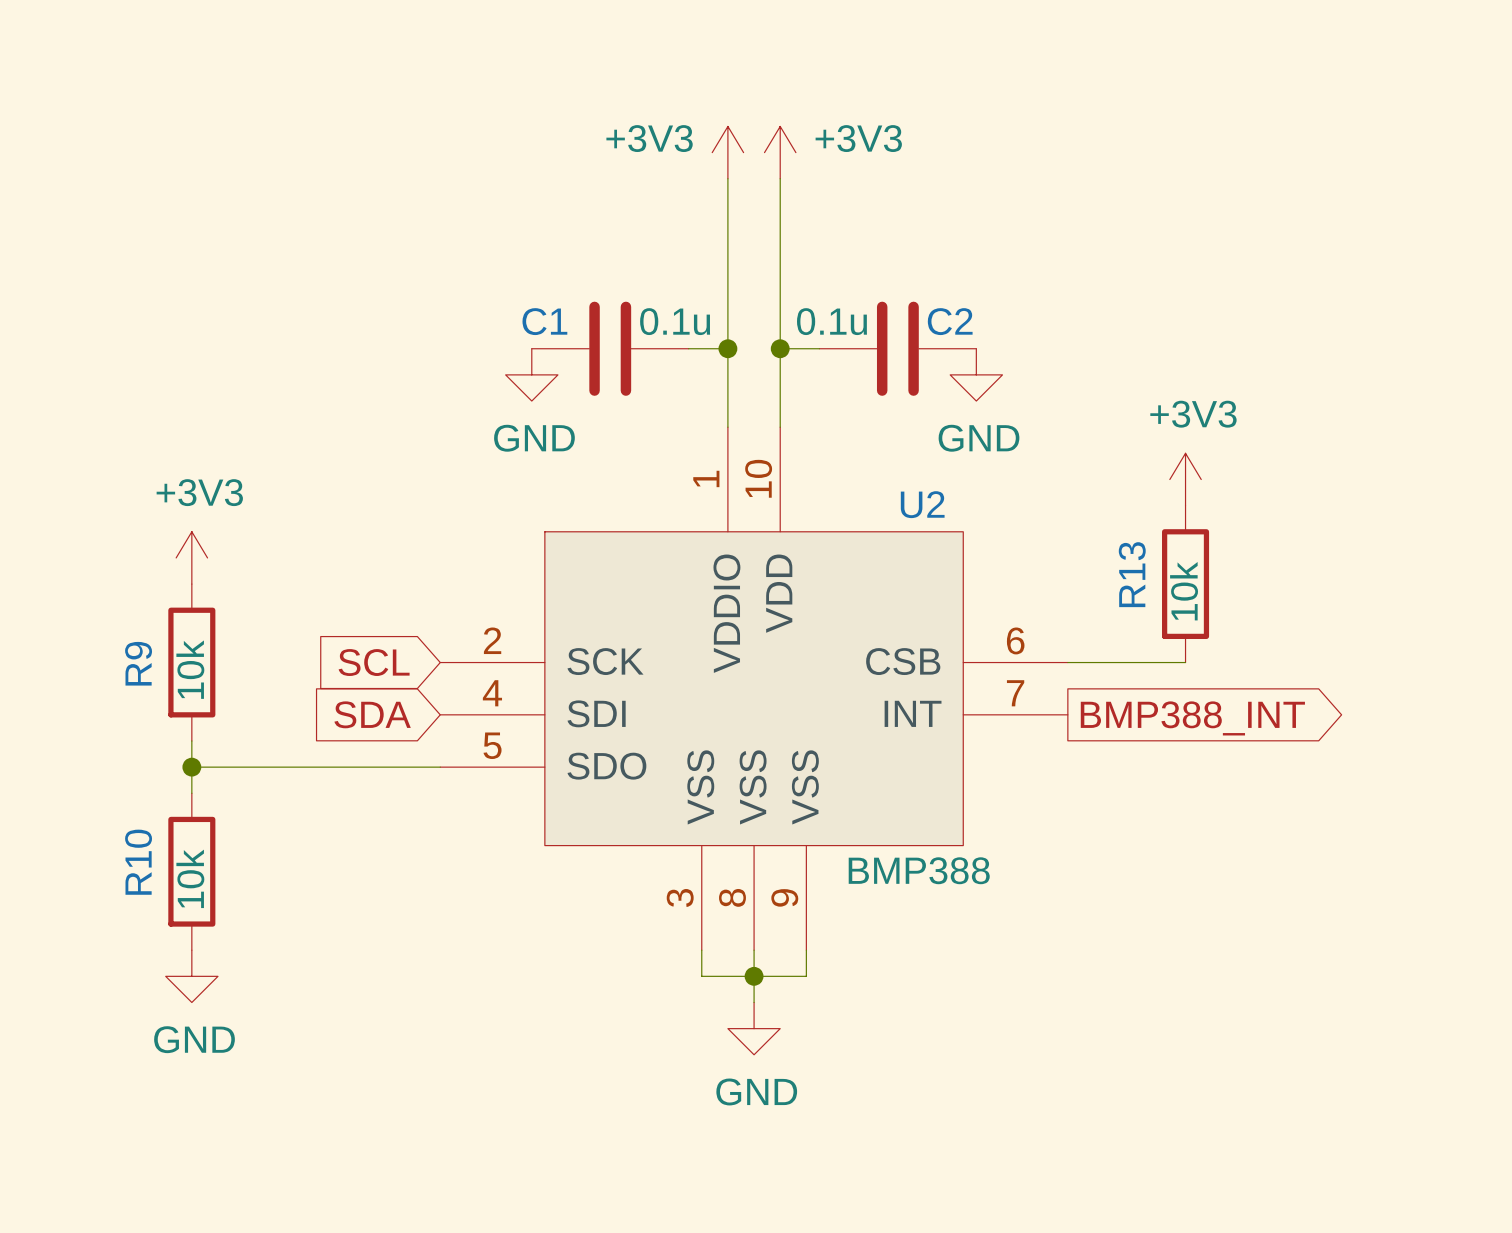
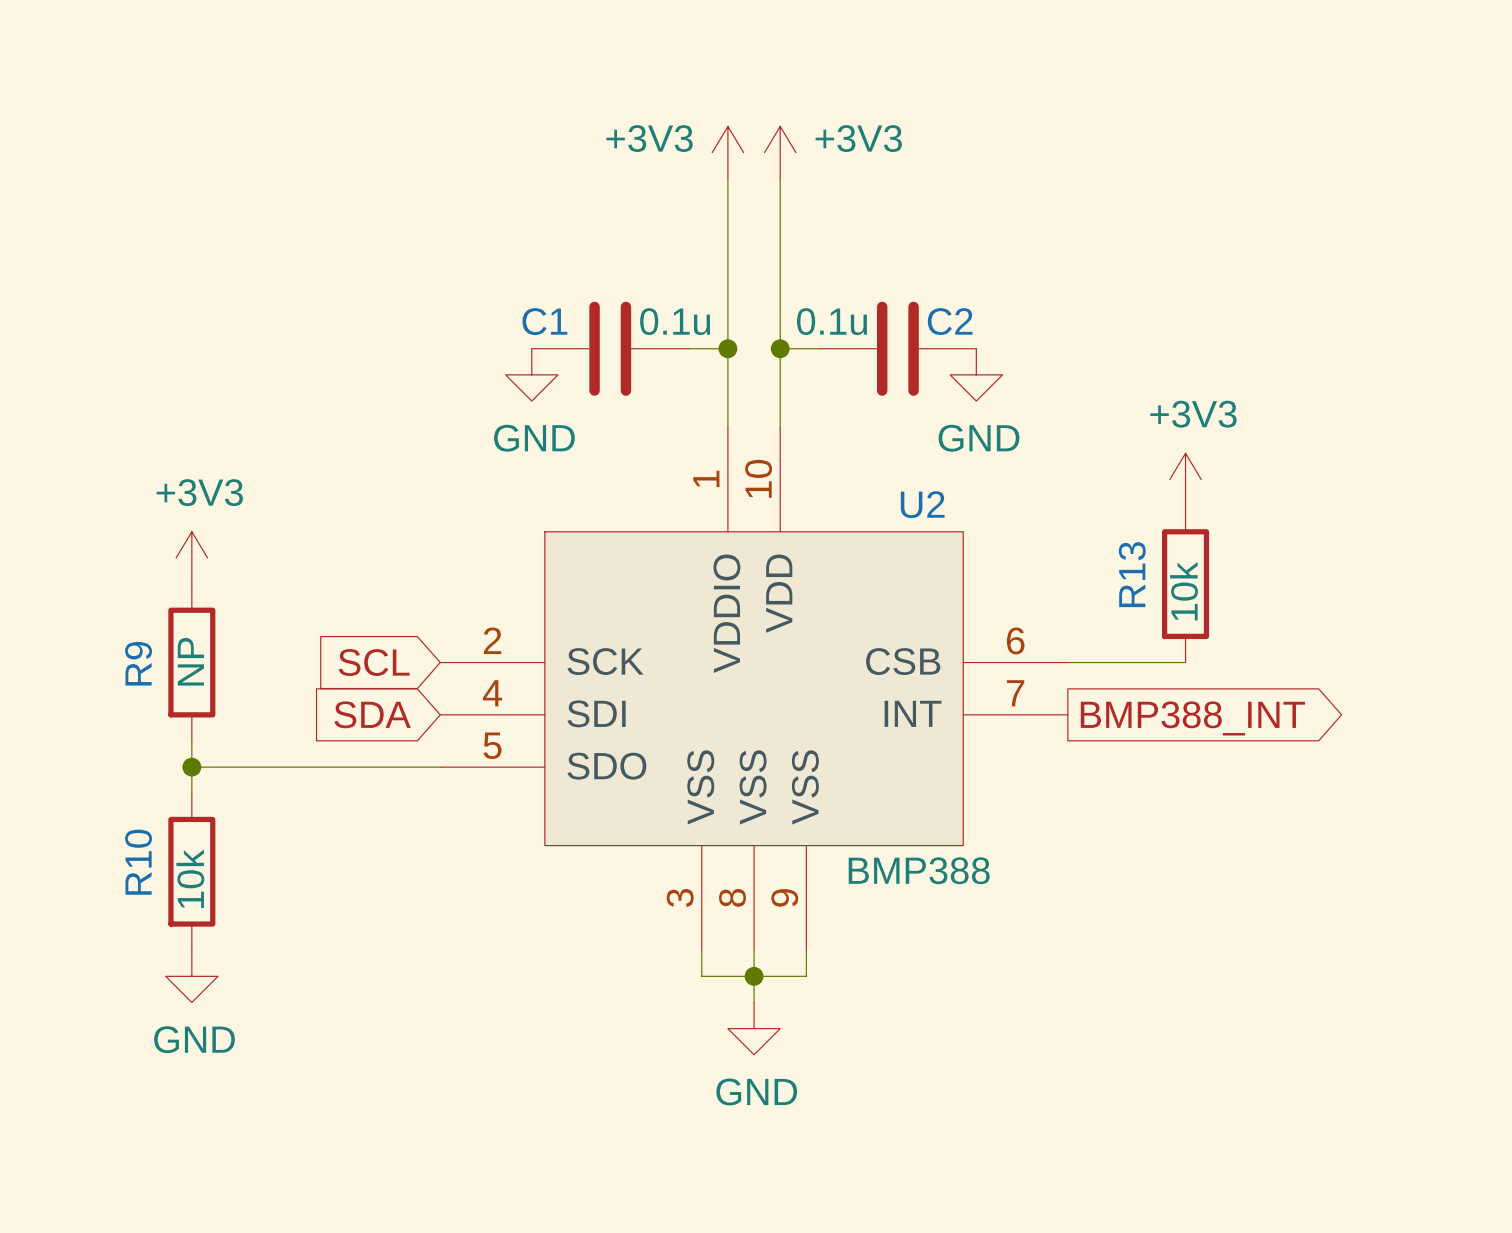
R9 value: 10k (190, 669) -> NP (190, 661)

